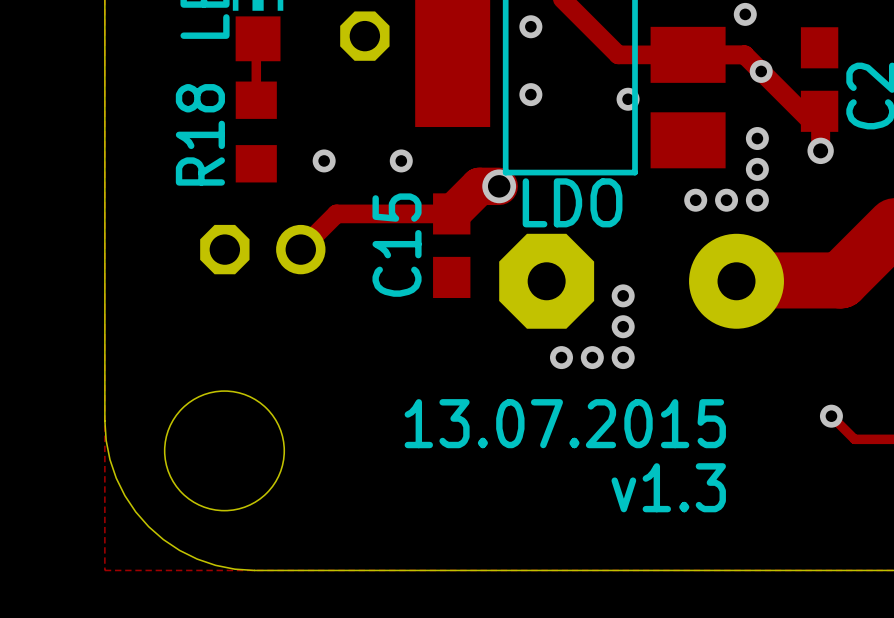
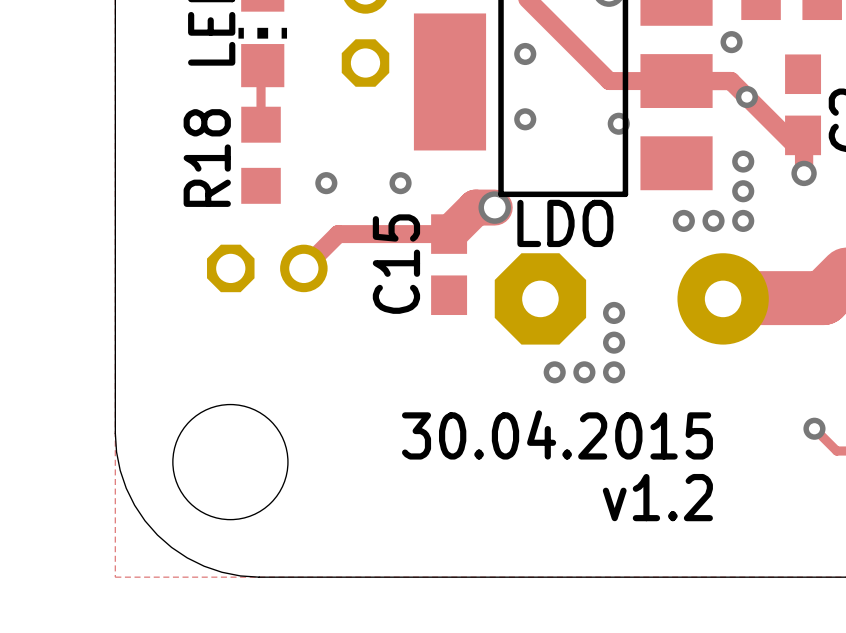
text: 13.07.2015 (565, 423) -> 30.04.2015 (557, 434)
text: v1.3 (668, 487) -> v1.2 (657, 497)

